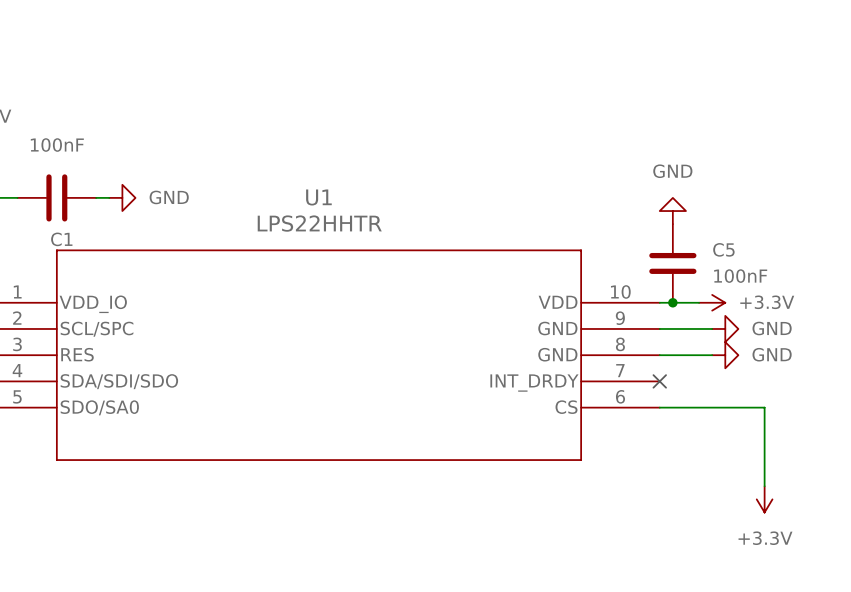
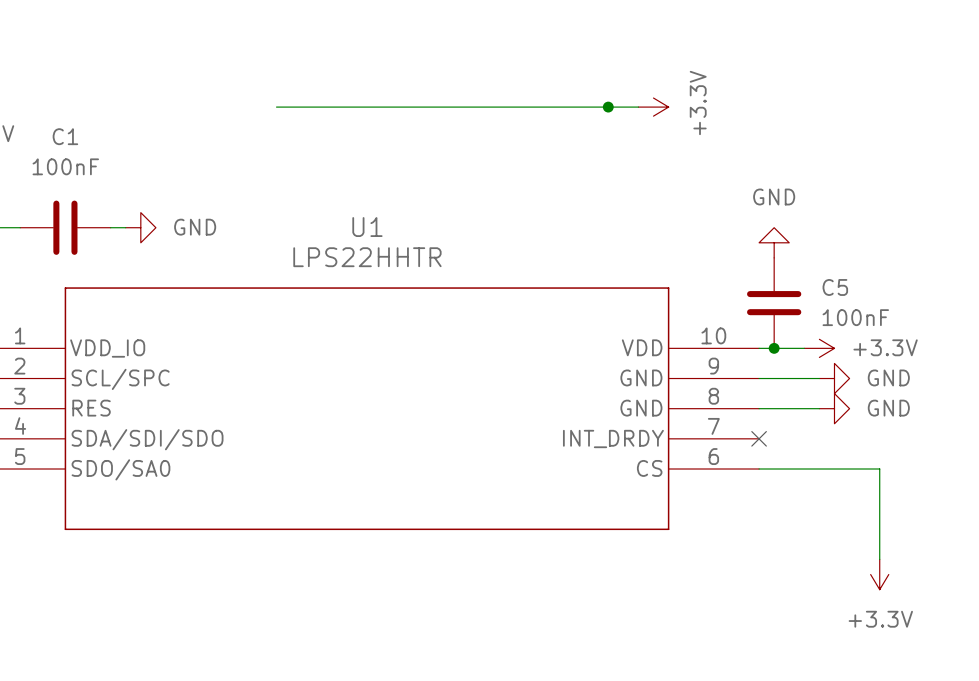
wire: none -> (276, 107) (638, 107)
junction: none -> (608, 107)
power symbol: none -> +3.3V (653, 107)
C1 name position: C1 (61, 239) -> C1 (65, 136)

